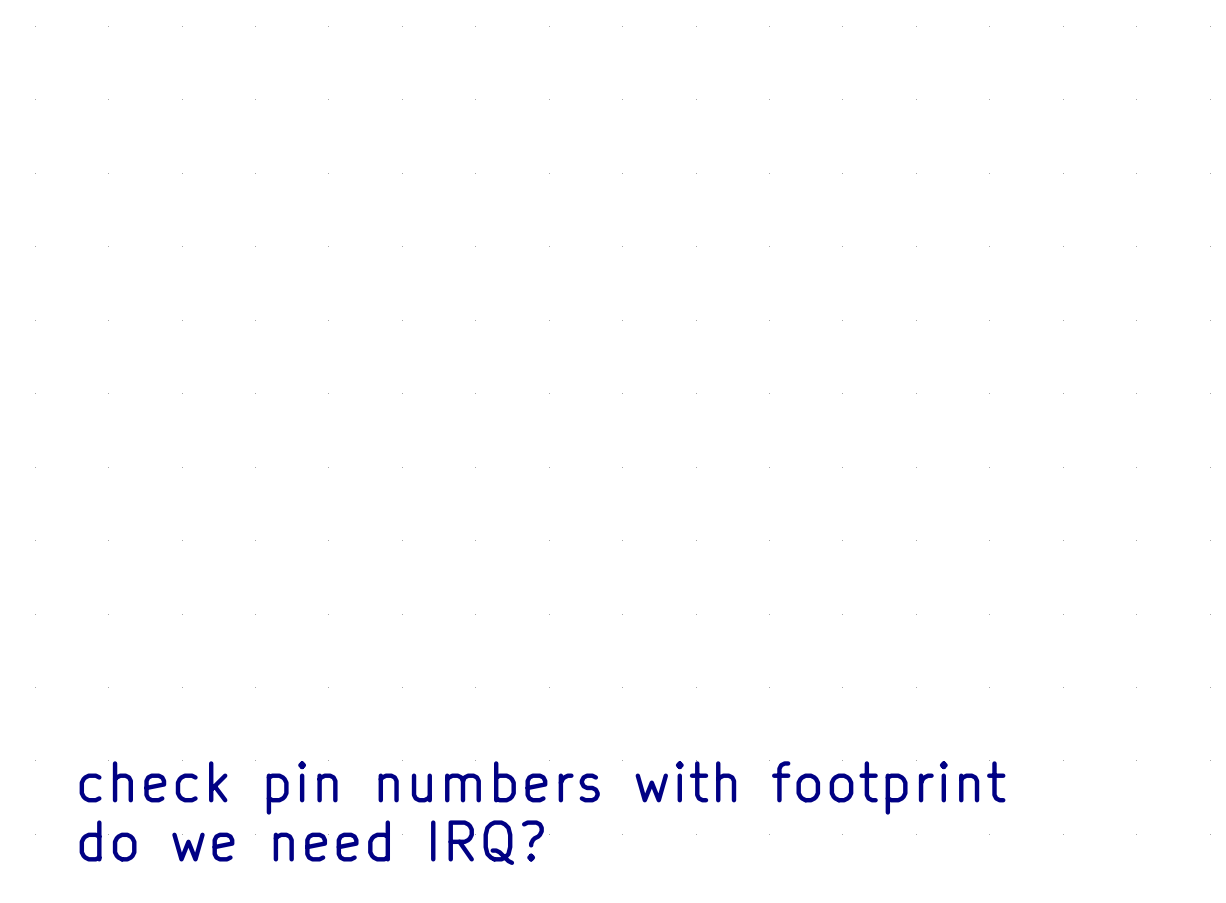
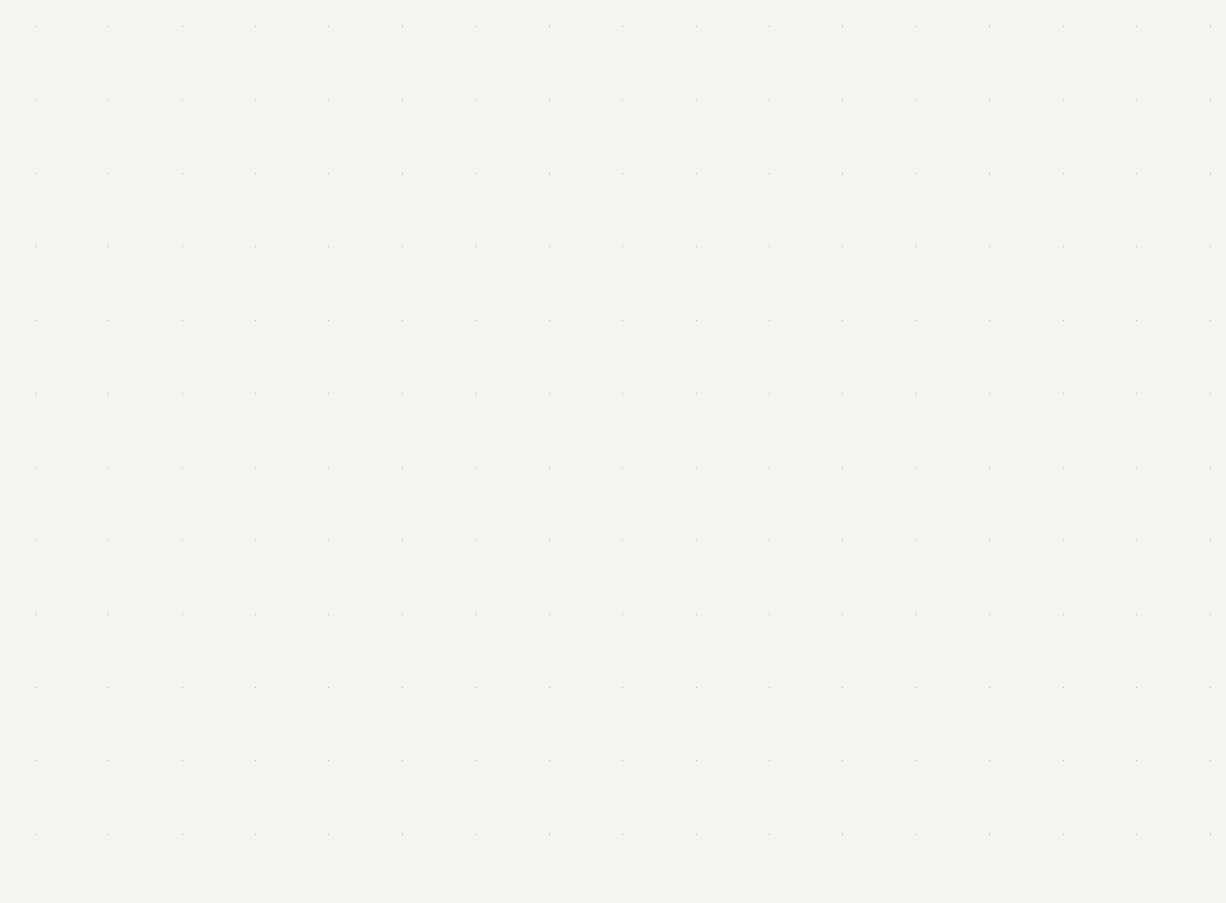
text: check pin numbers with footprint (542, 787) -> none
text: do we need IRQ? (311, 842) -> none

